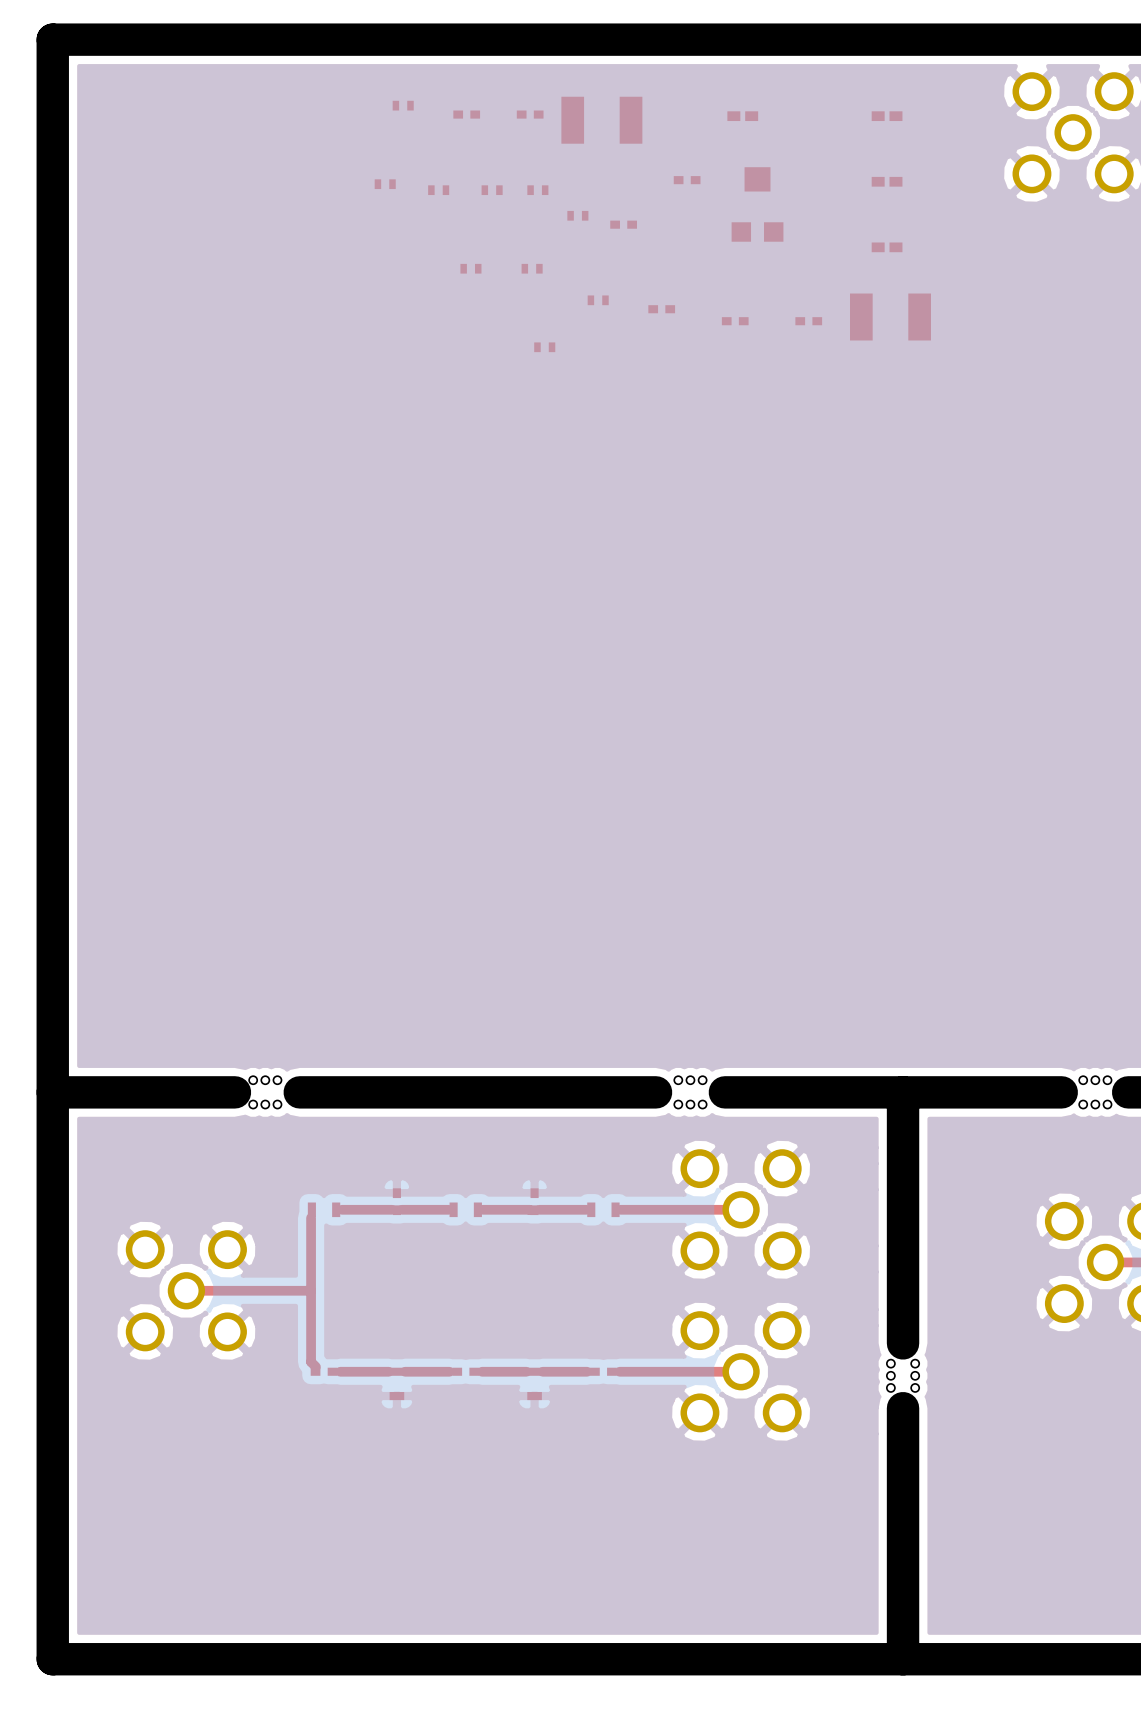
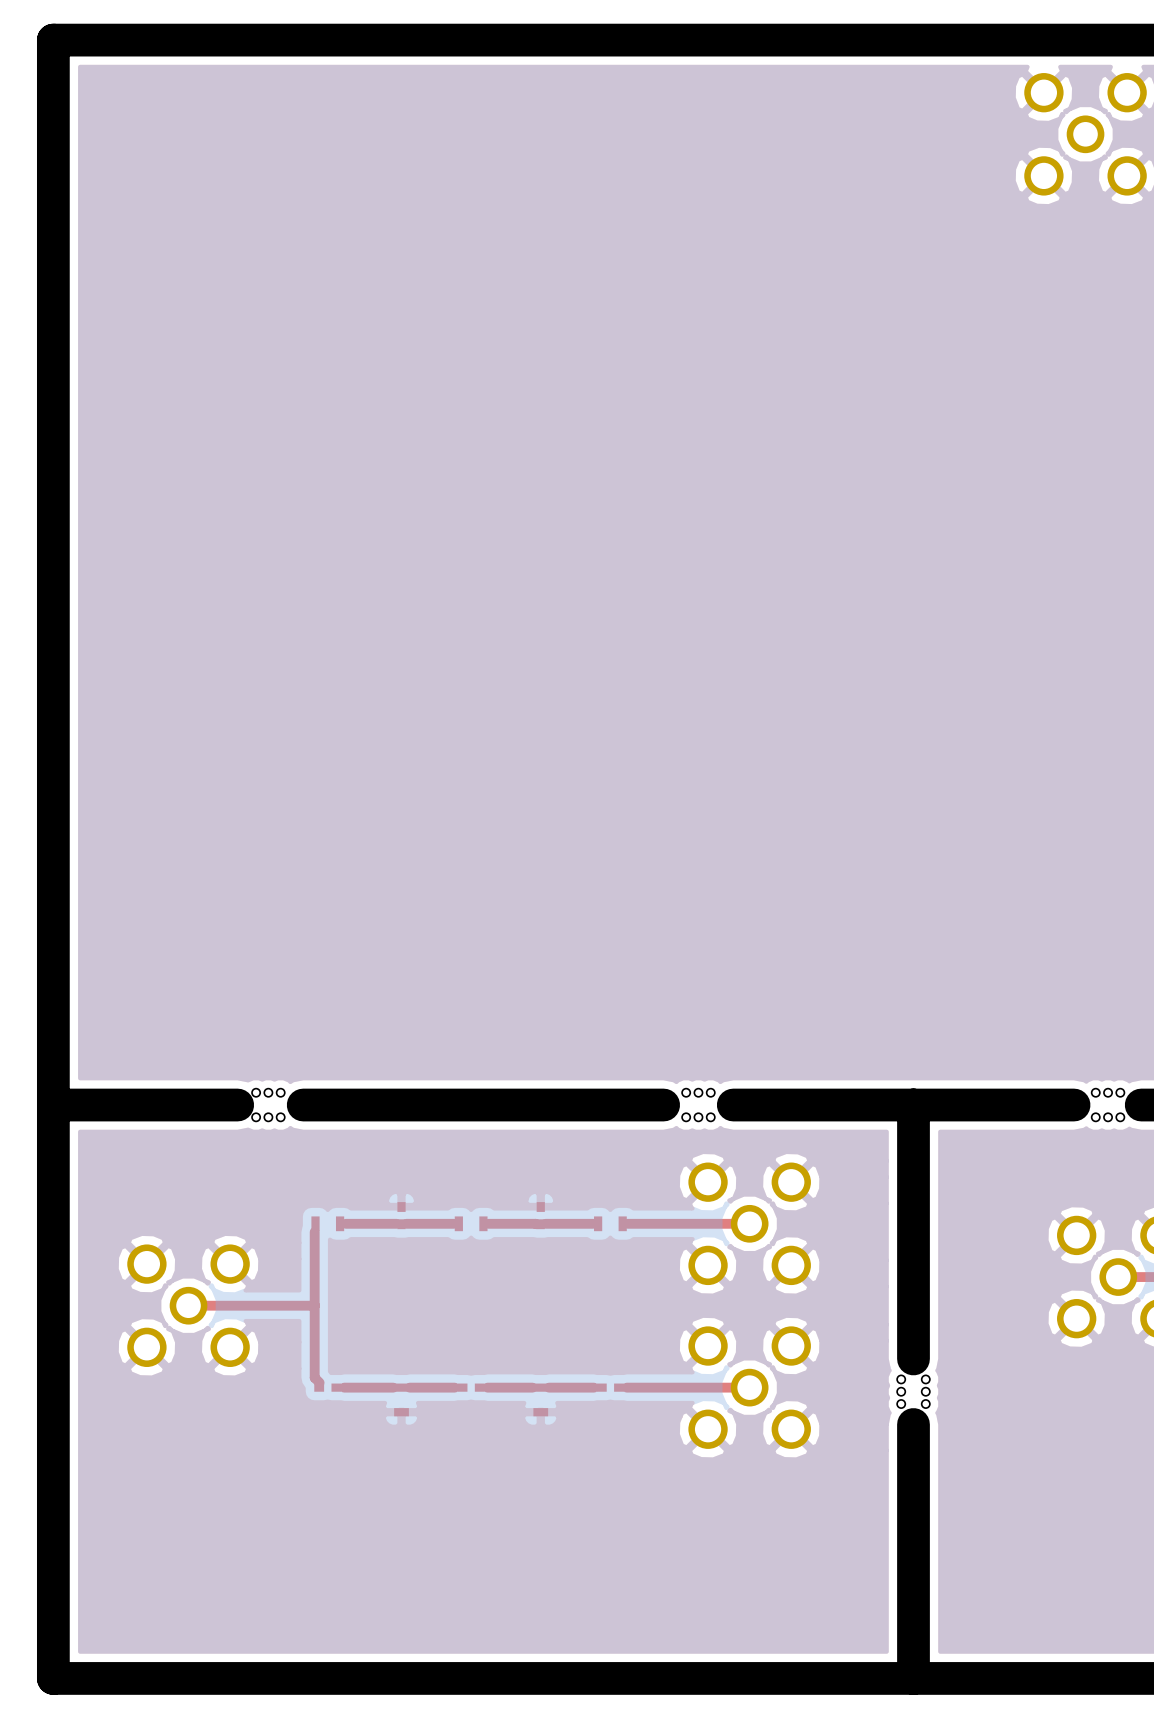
part: (403, 105) -> none
part: (466, 114) -> none
part: (530, 114) -> none
part: (742, 116) -> none
part: (887, 116) -> none
part: (601, 120) -> none
part: (687, 180) -> none
part: (887, 181) -> none
part: (385, 184) -> none
part: (438, 190) -> none
part: (492, 190) -> none
part: (537, 190) -> none
part: (757, 204) -> none
part: (577, 215) -> none
part: (623, 224) -> none
part: (887, 247) -> none
part: (470, 268) -> none
part: (532, 268) -> none
part: (598, 300) -> none
part: (661, 309) -> none
part: (890, 316) -> none
part: (735, 321) -> none
part: (808, 321) -> none
part: (544, 347) -> none

